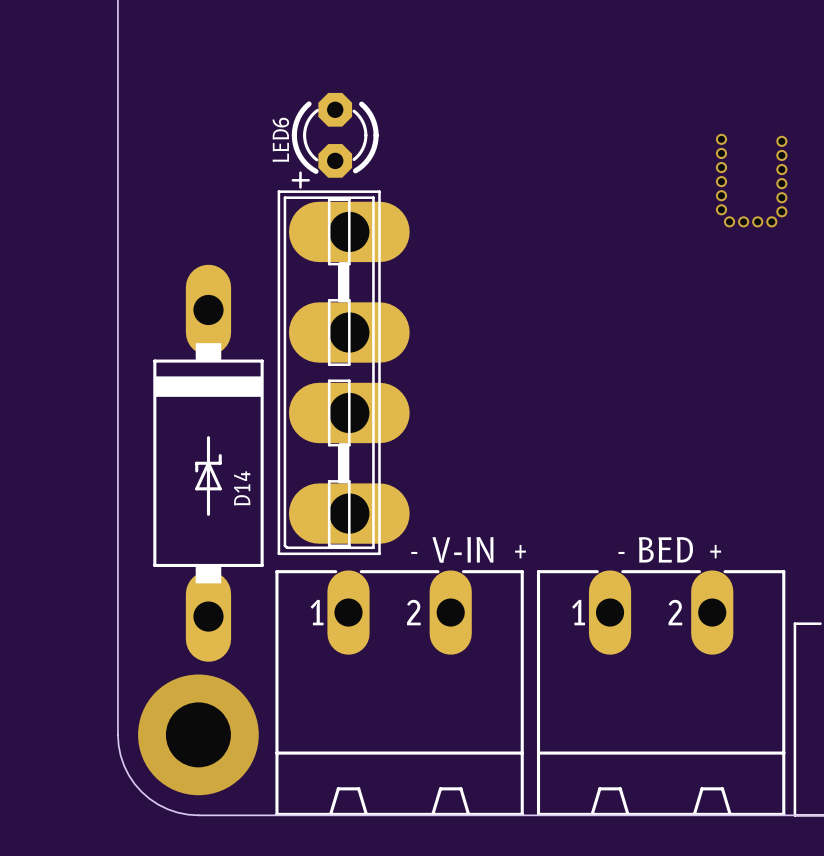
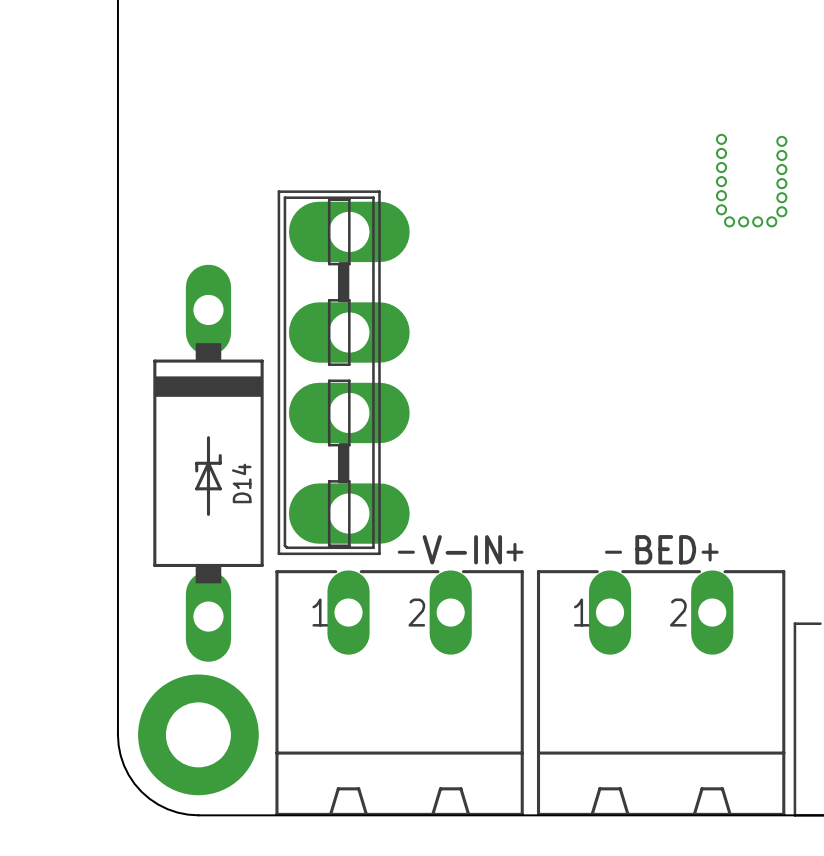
LED6: (335, 140) -> none

